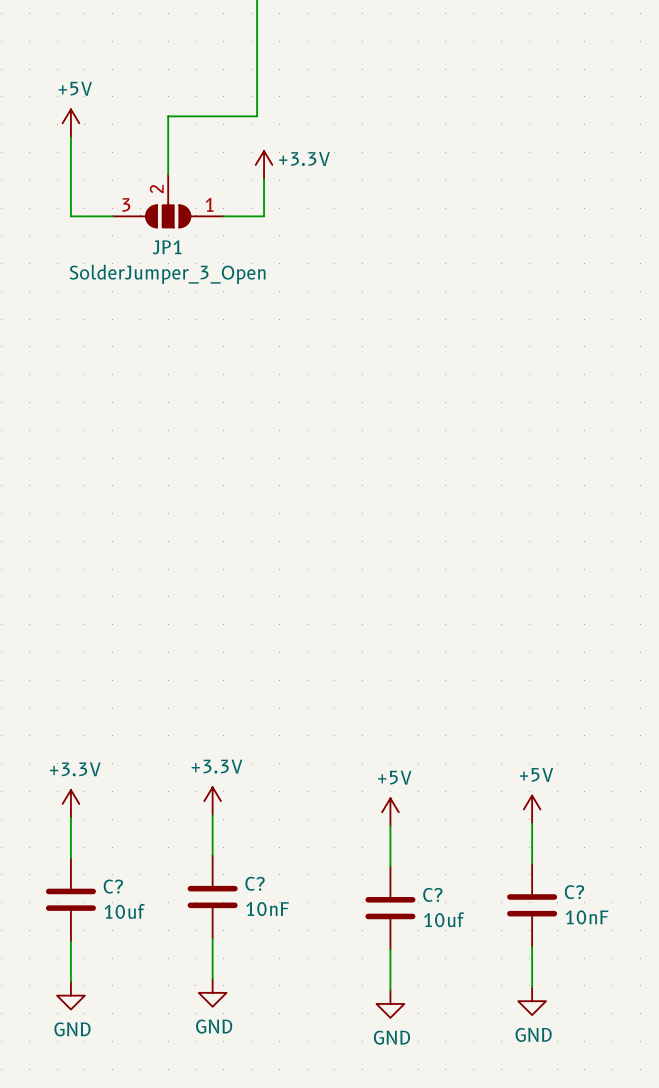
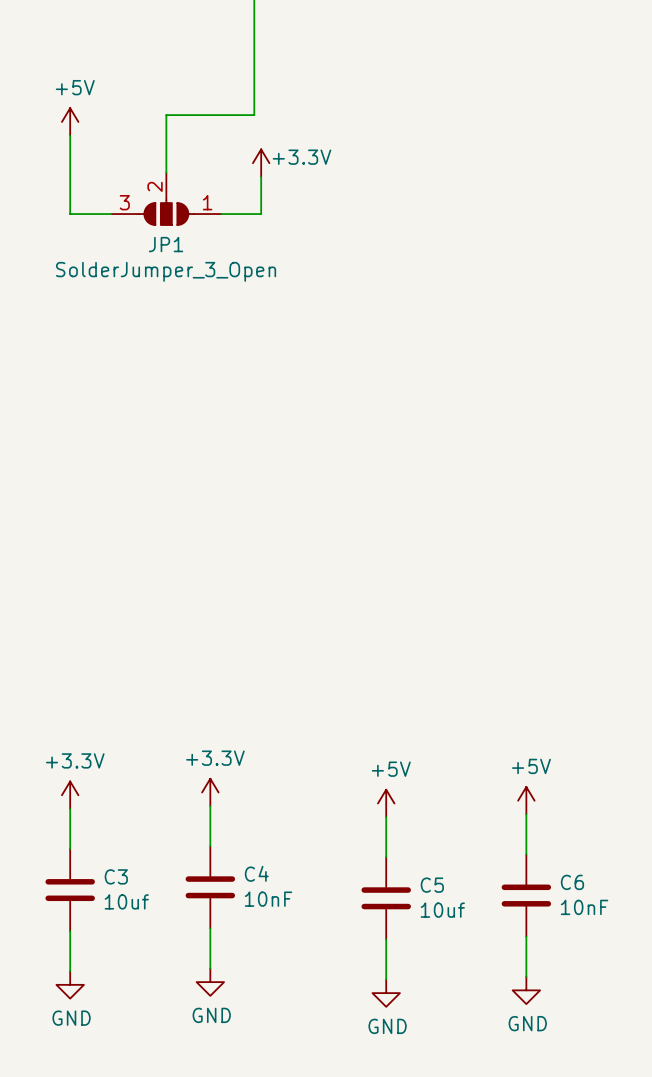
C? name: C? (255, 883) -> C4 (256, 873)
C? name: C? (113, 886) -> C3 (116, 876)
C? name: C? (574, 892) -> C6 (572, 882)
C? name: C? (432, 894) -> C5 (432, 885)

